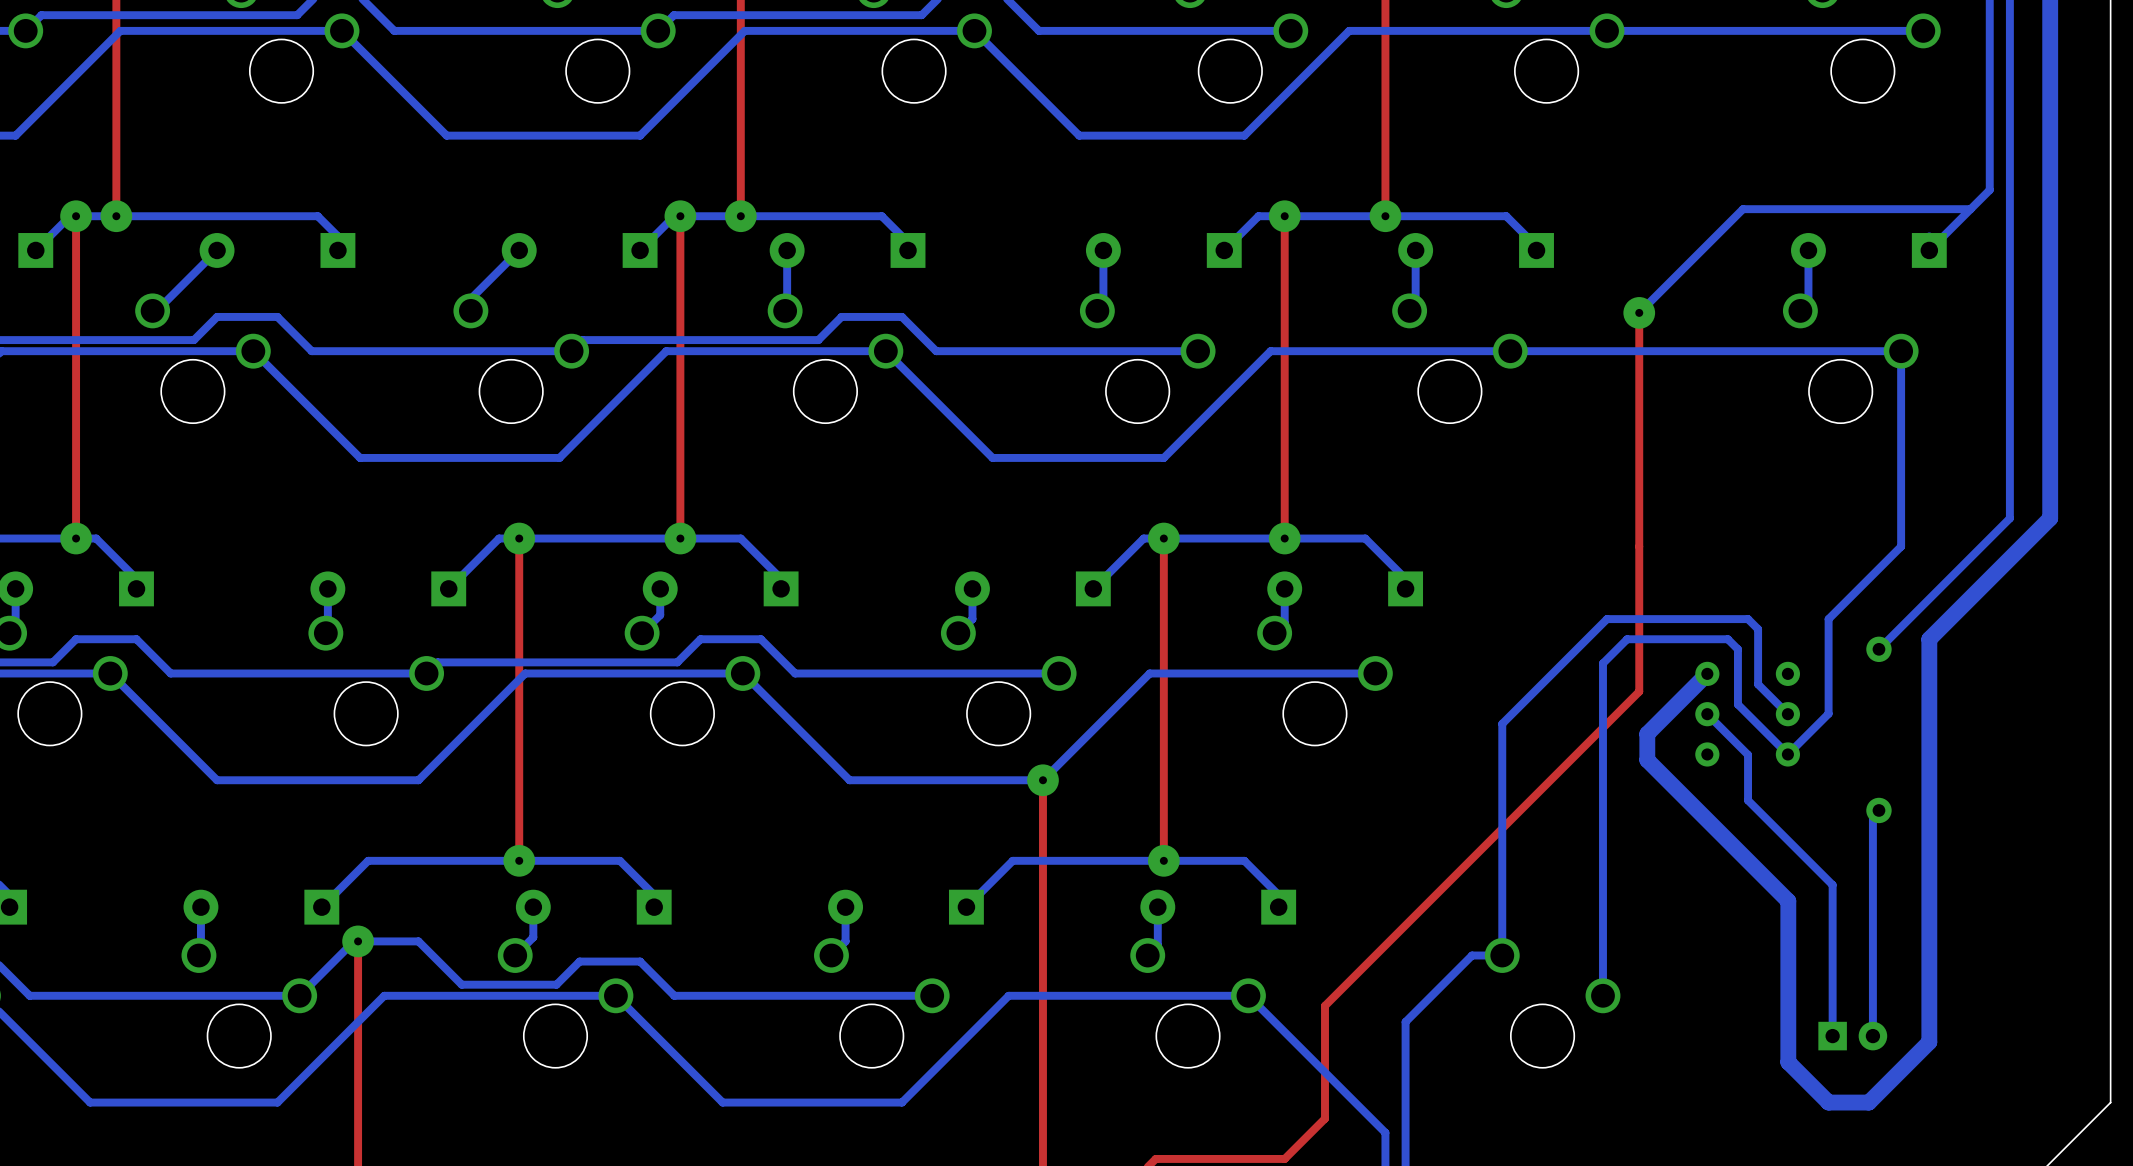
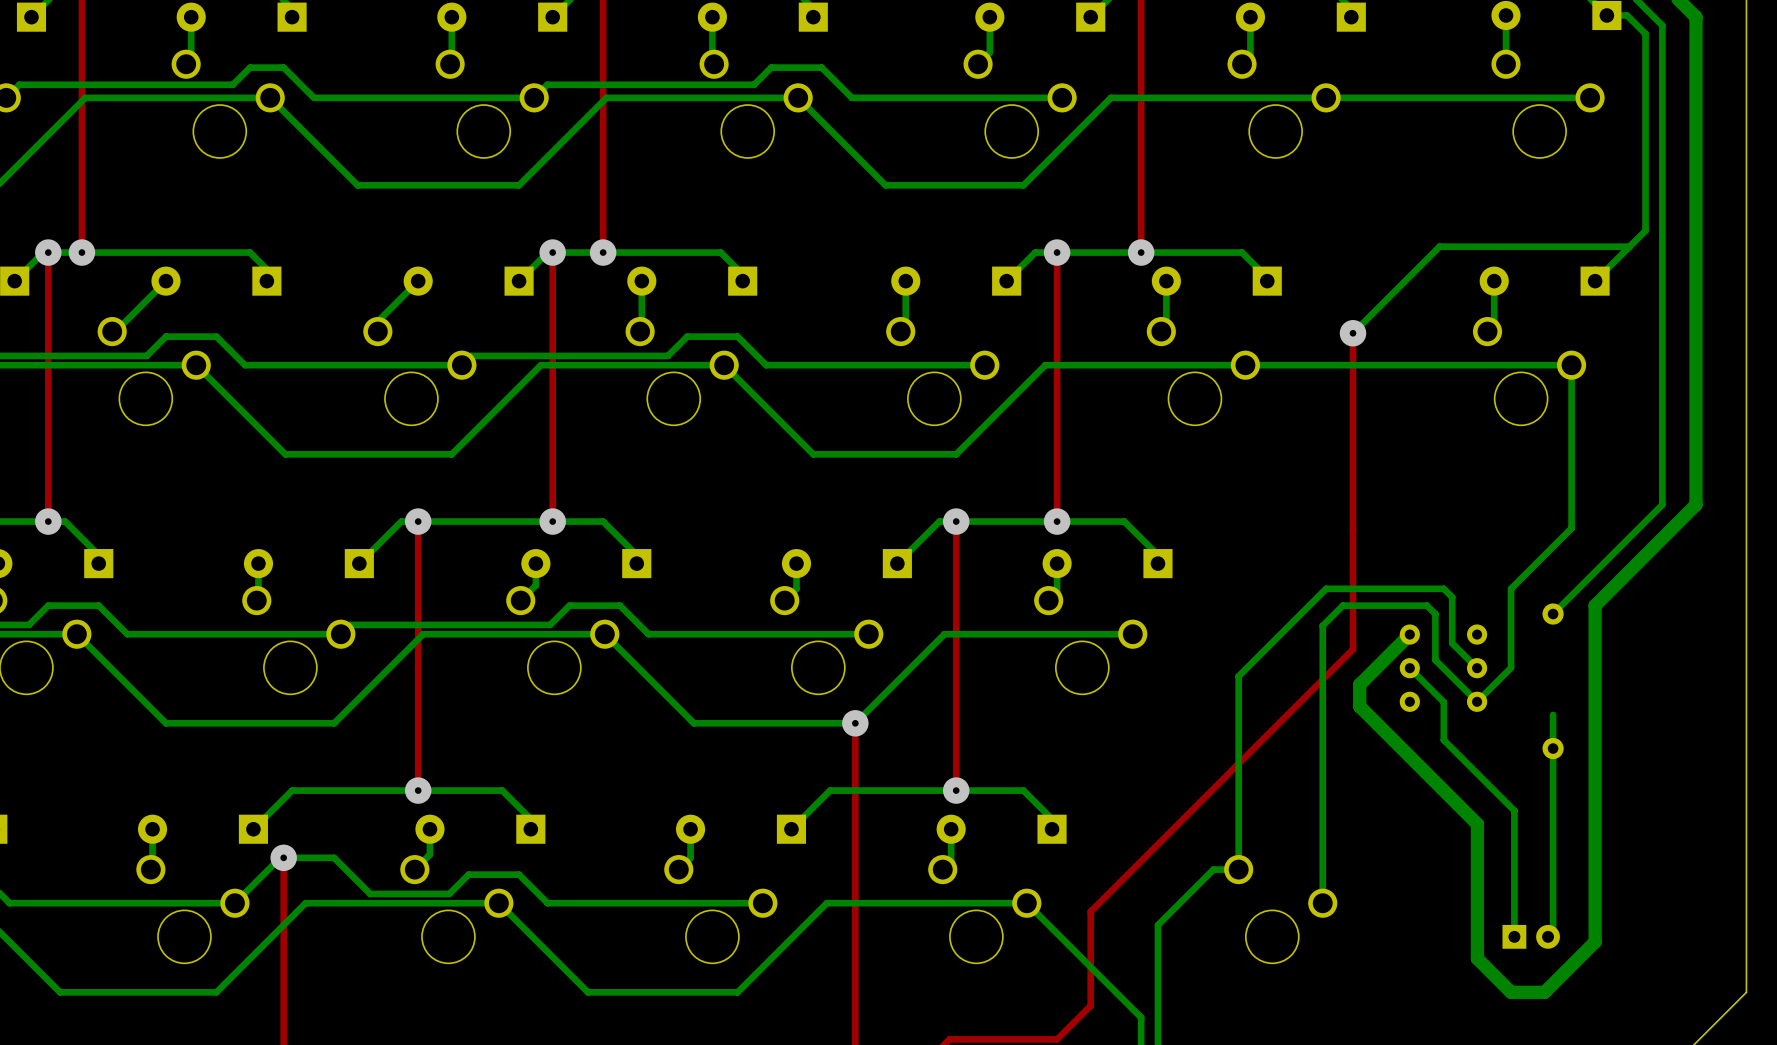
bottom track: none -> (1553, 714) (1553, 931)
bottom track: (1878, 810) (1872, 816) (1872, 1036) -> none

